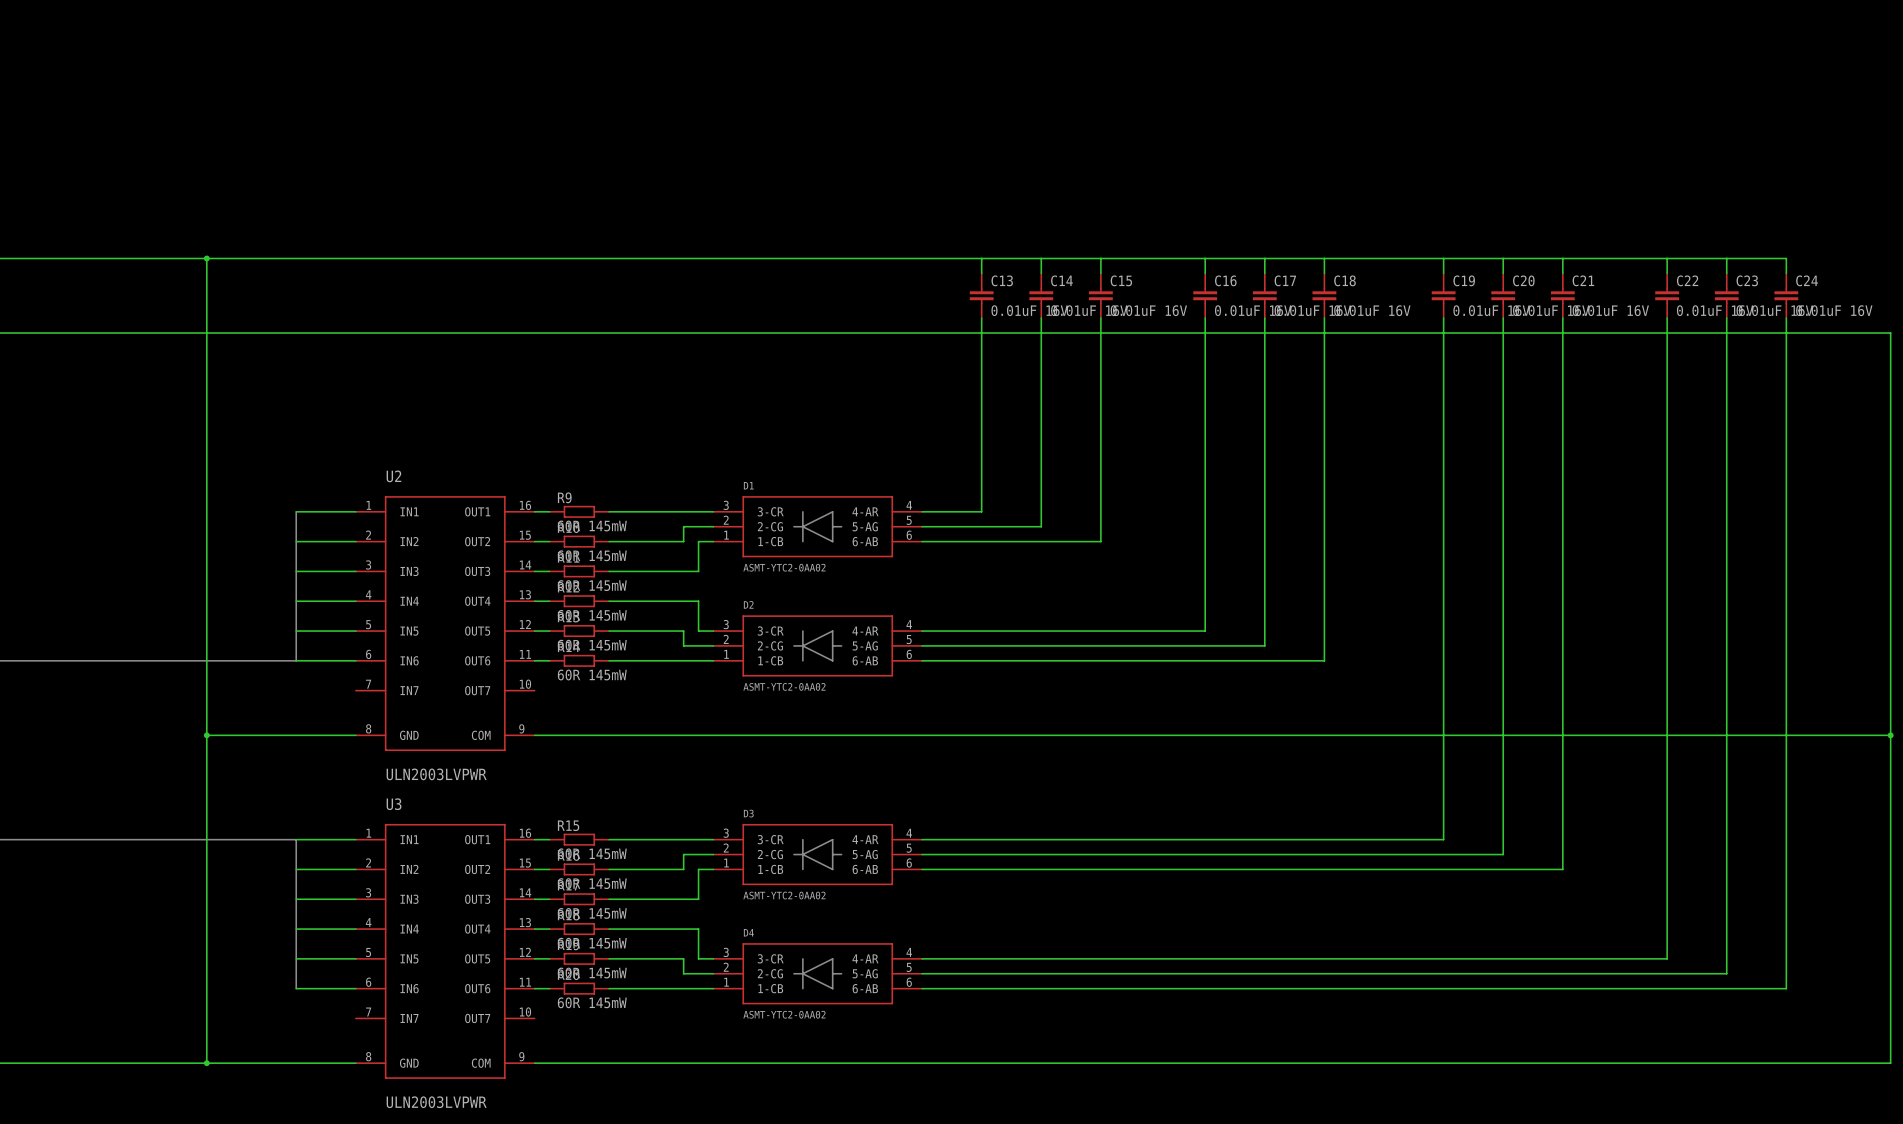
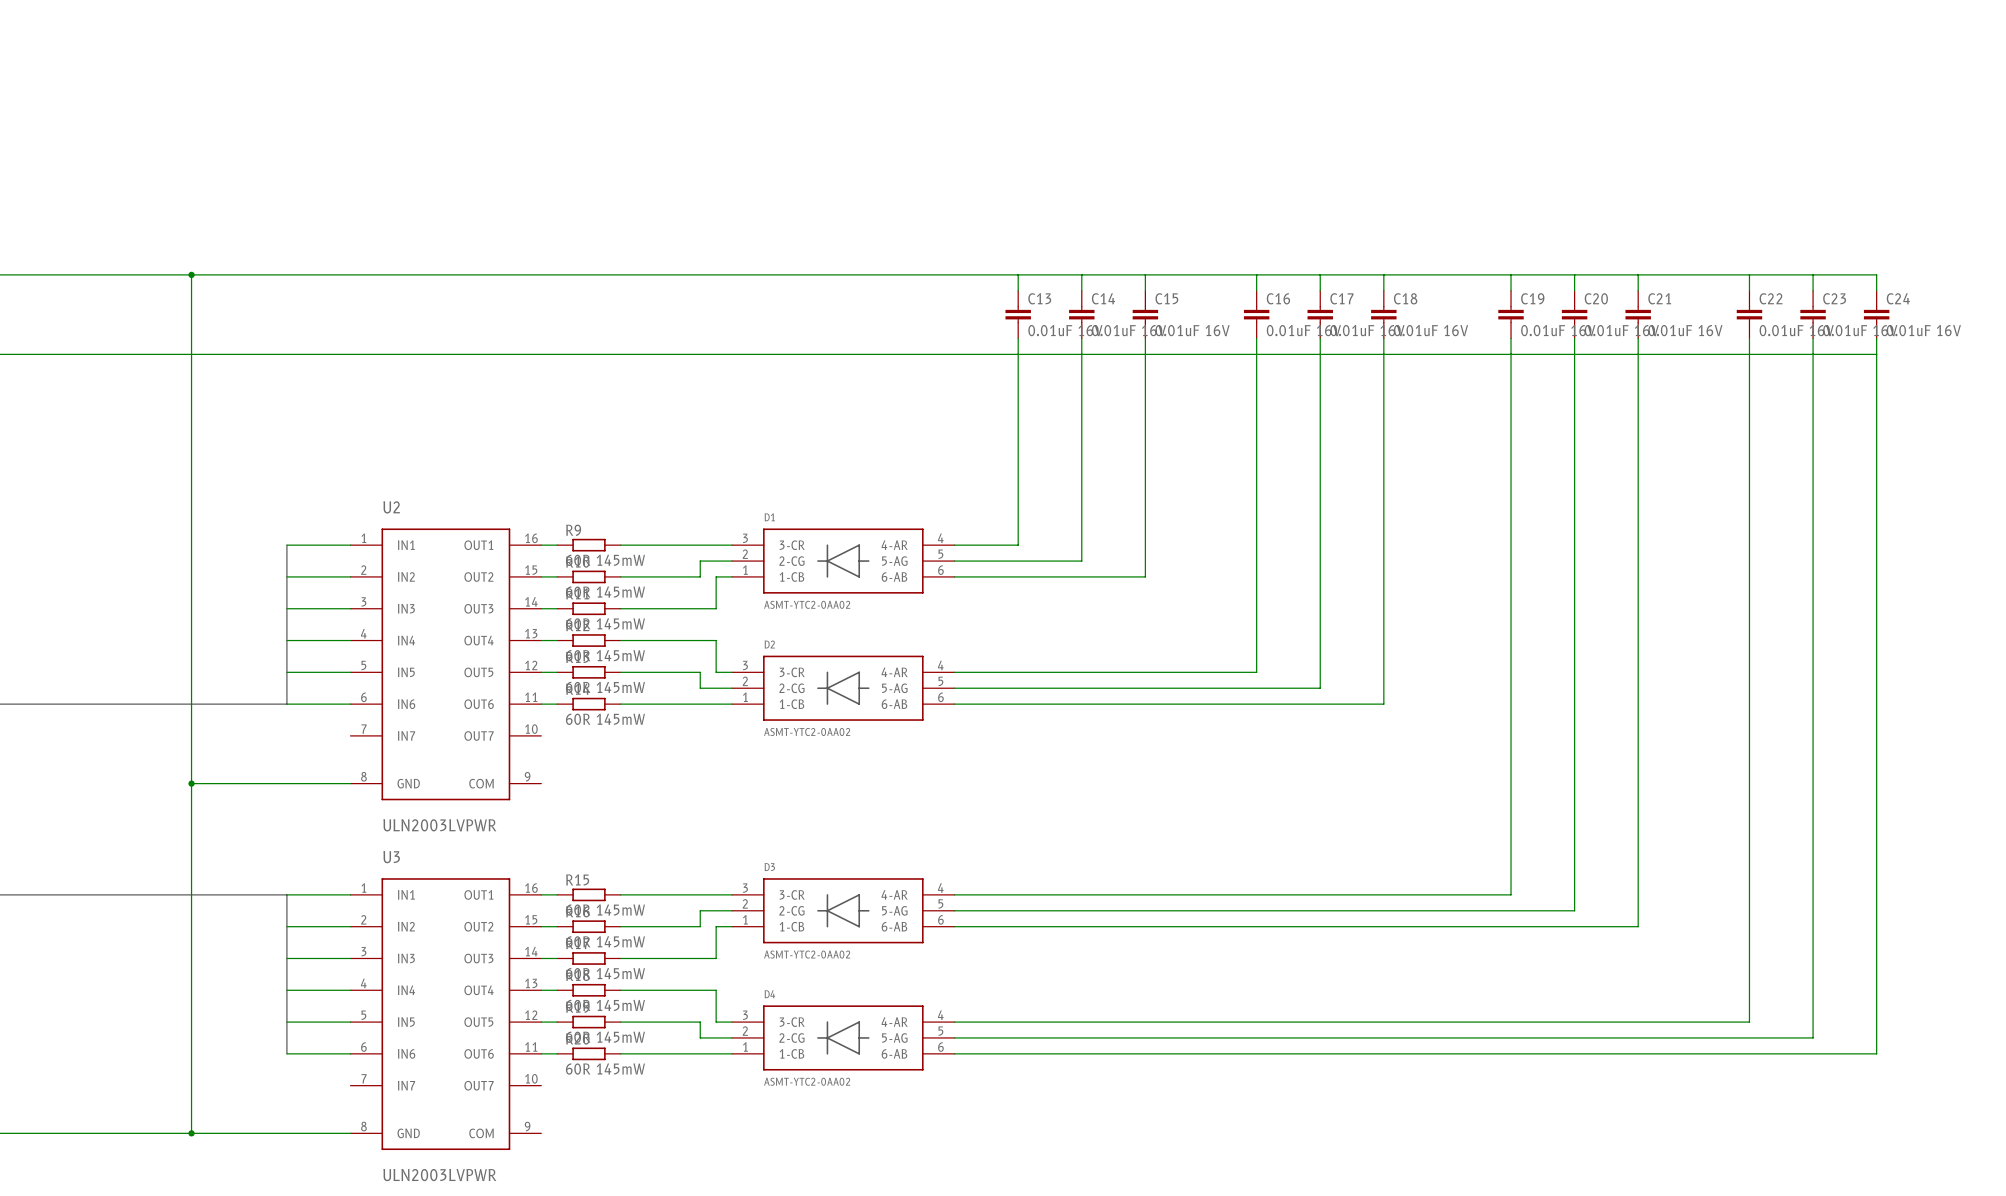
wire: (1786, 333) (1890, 333) (1890, 1063) (534, 1063) -> none
wire: (534, 735) (1890, 735) -> none
junction: (1890, 735) -> none

